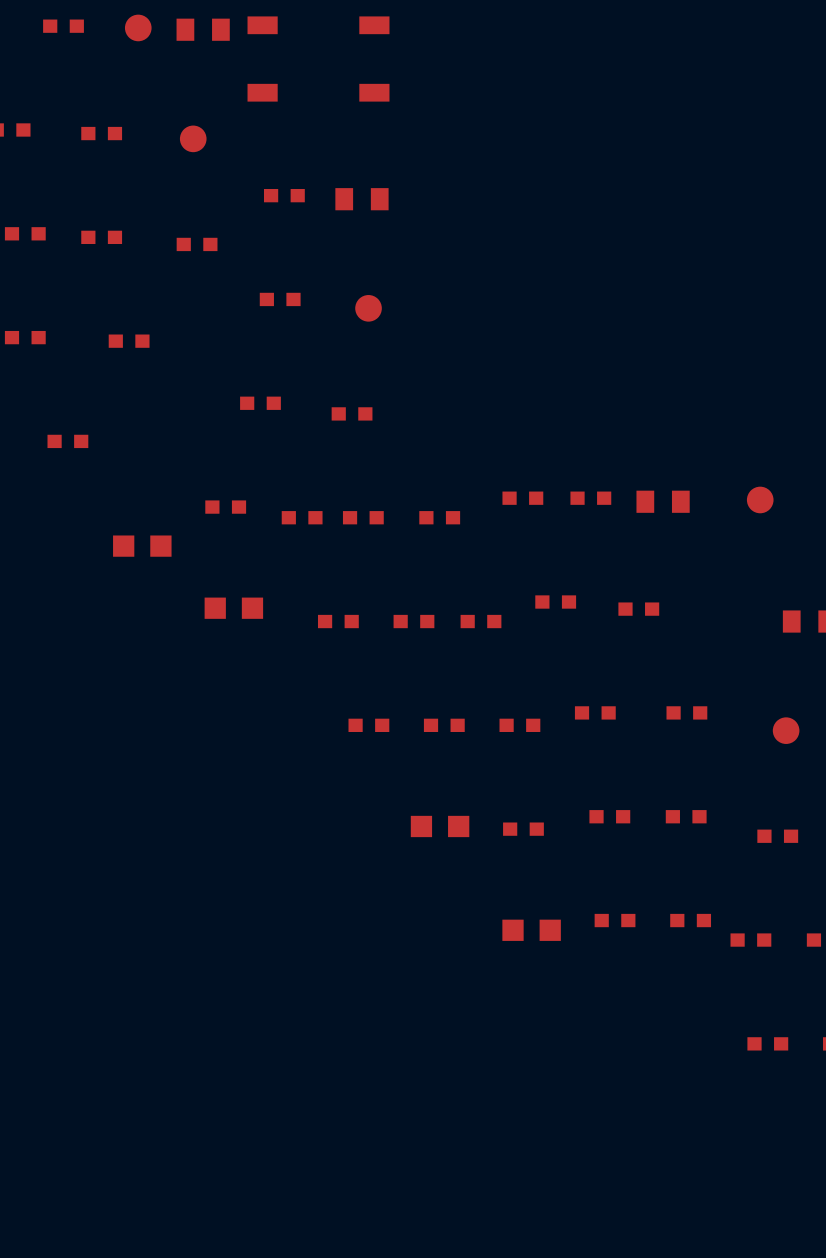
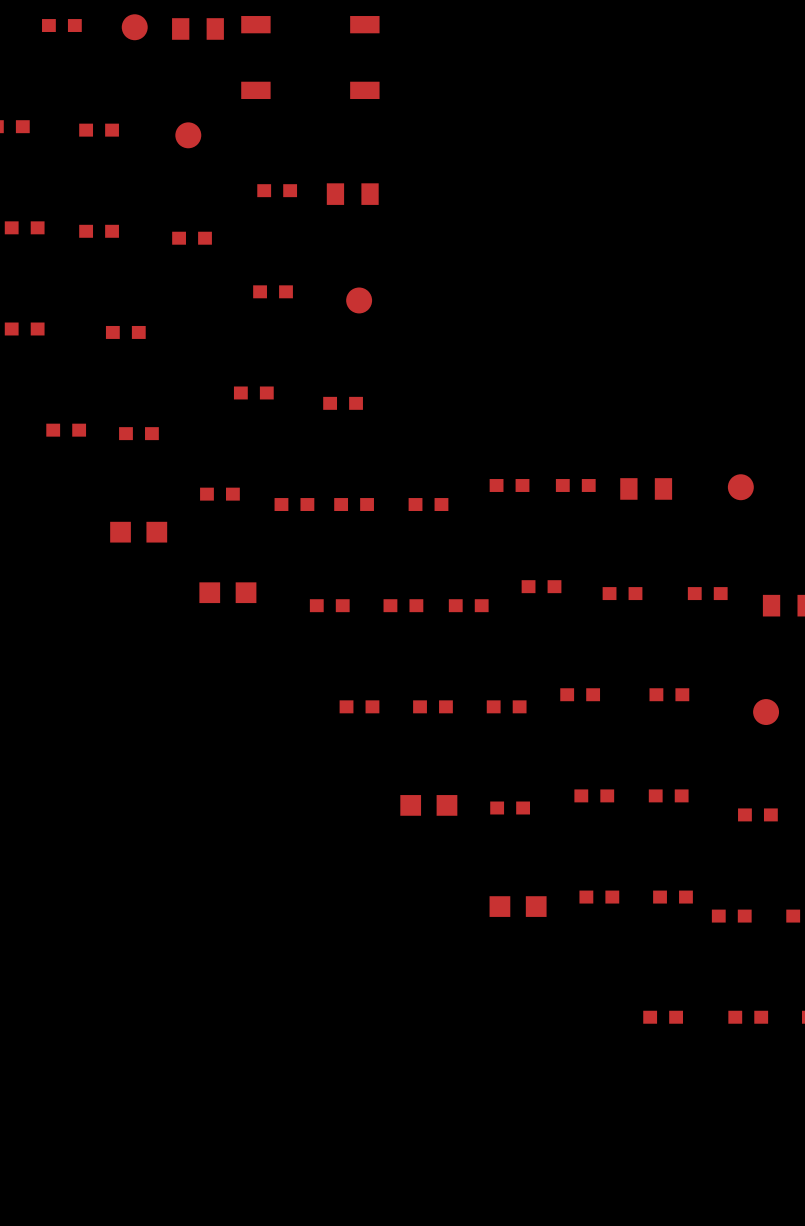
part: none -> (138, 433)
part: none -> (707, 593)
part: none -> (663, 1017)

